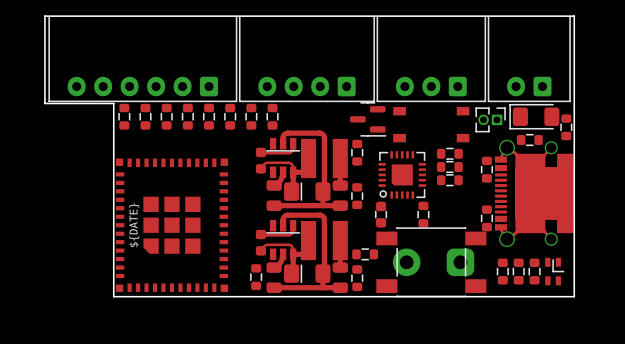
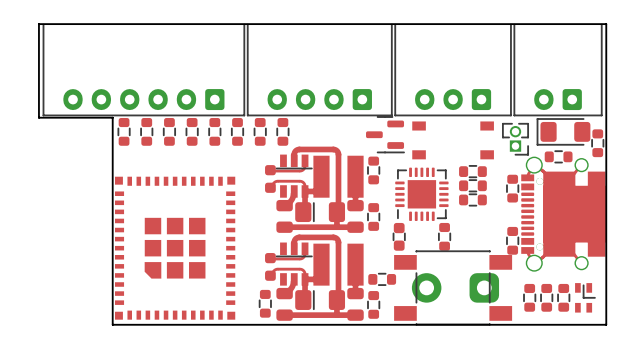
part rotation: 0° (490, 119) -> 90° clockwise (515, 139)
part footprint: [378, 151, 427, 199] -> [395, 167, 449, 221]
part footprint: [115, 158, 229, 292] -> [114, 176, 236, 320]

